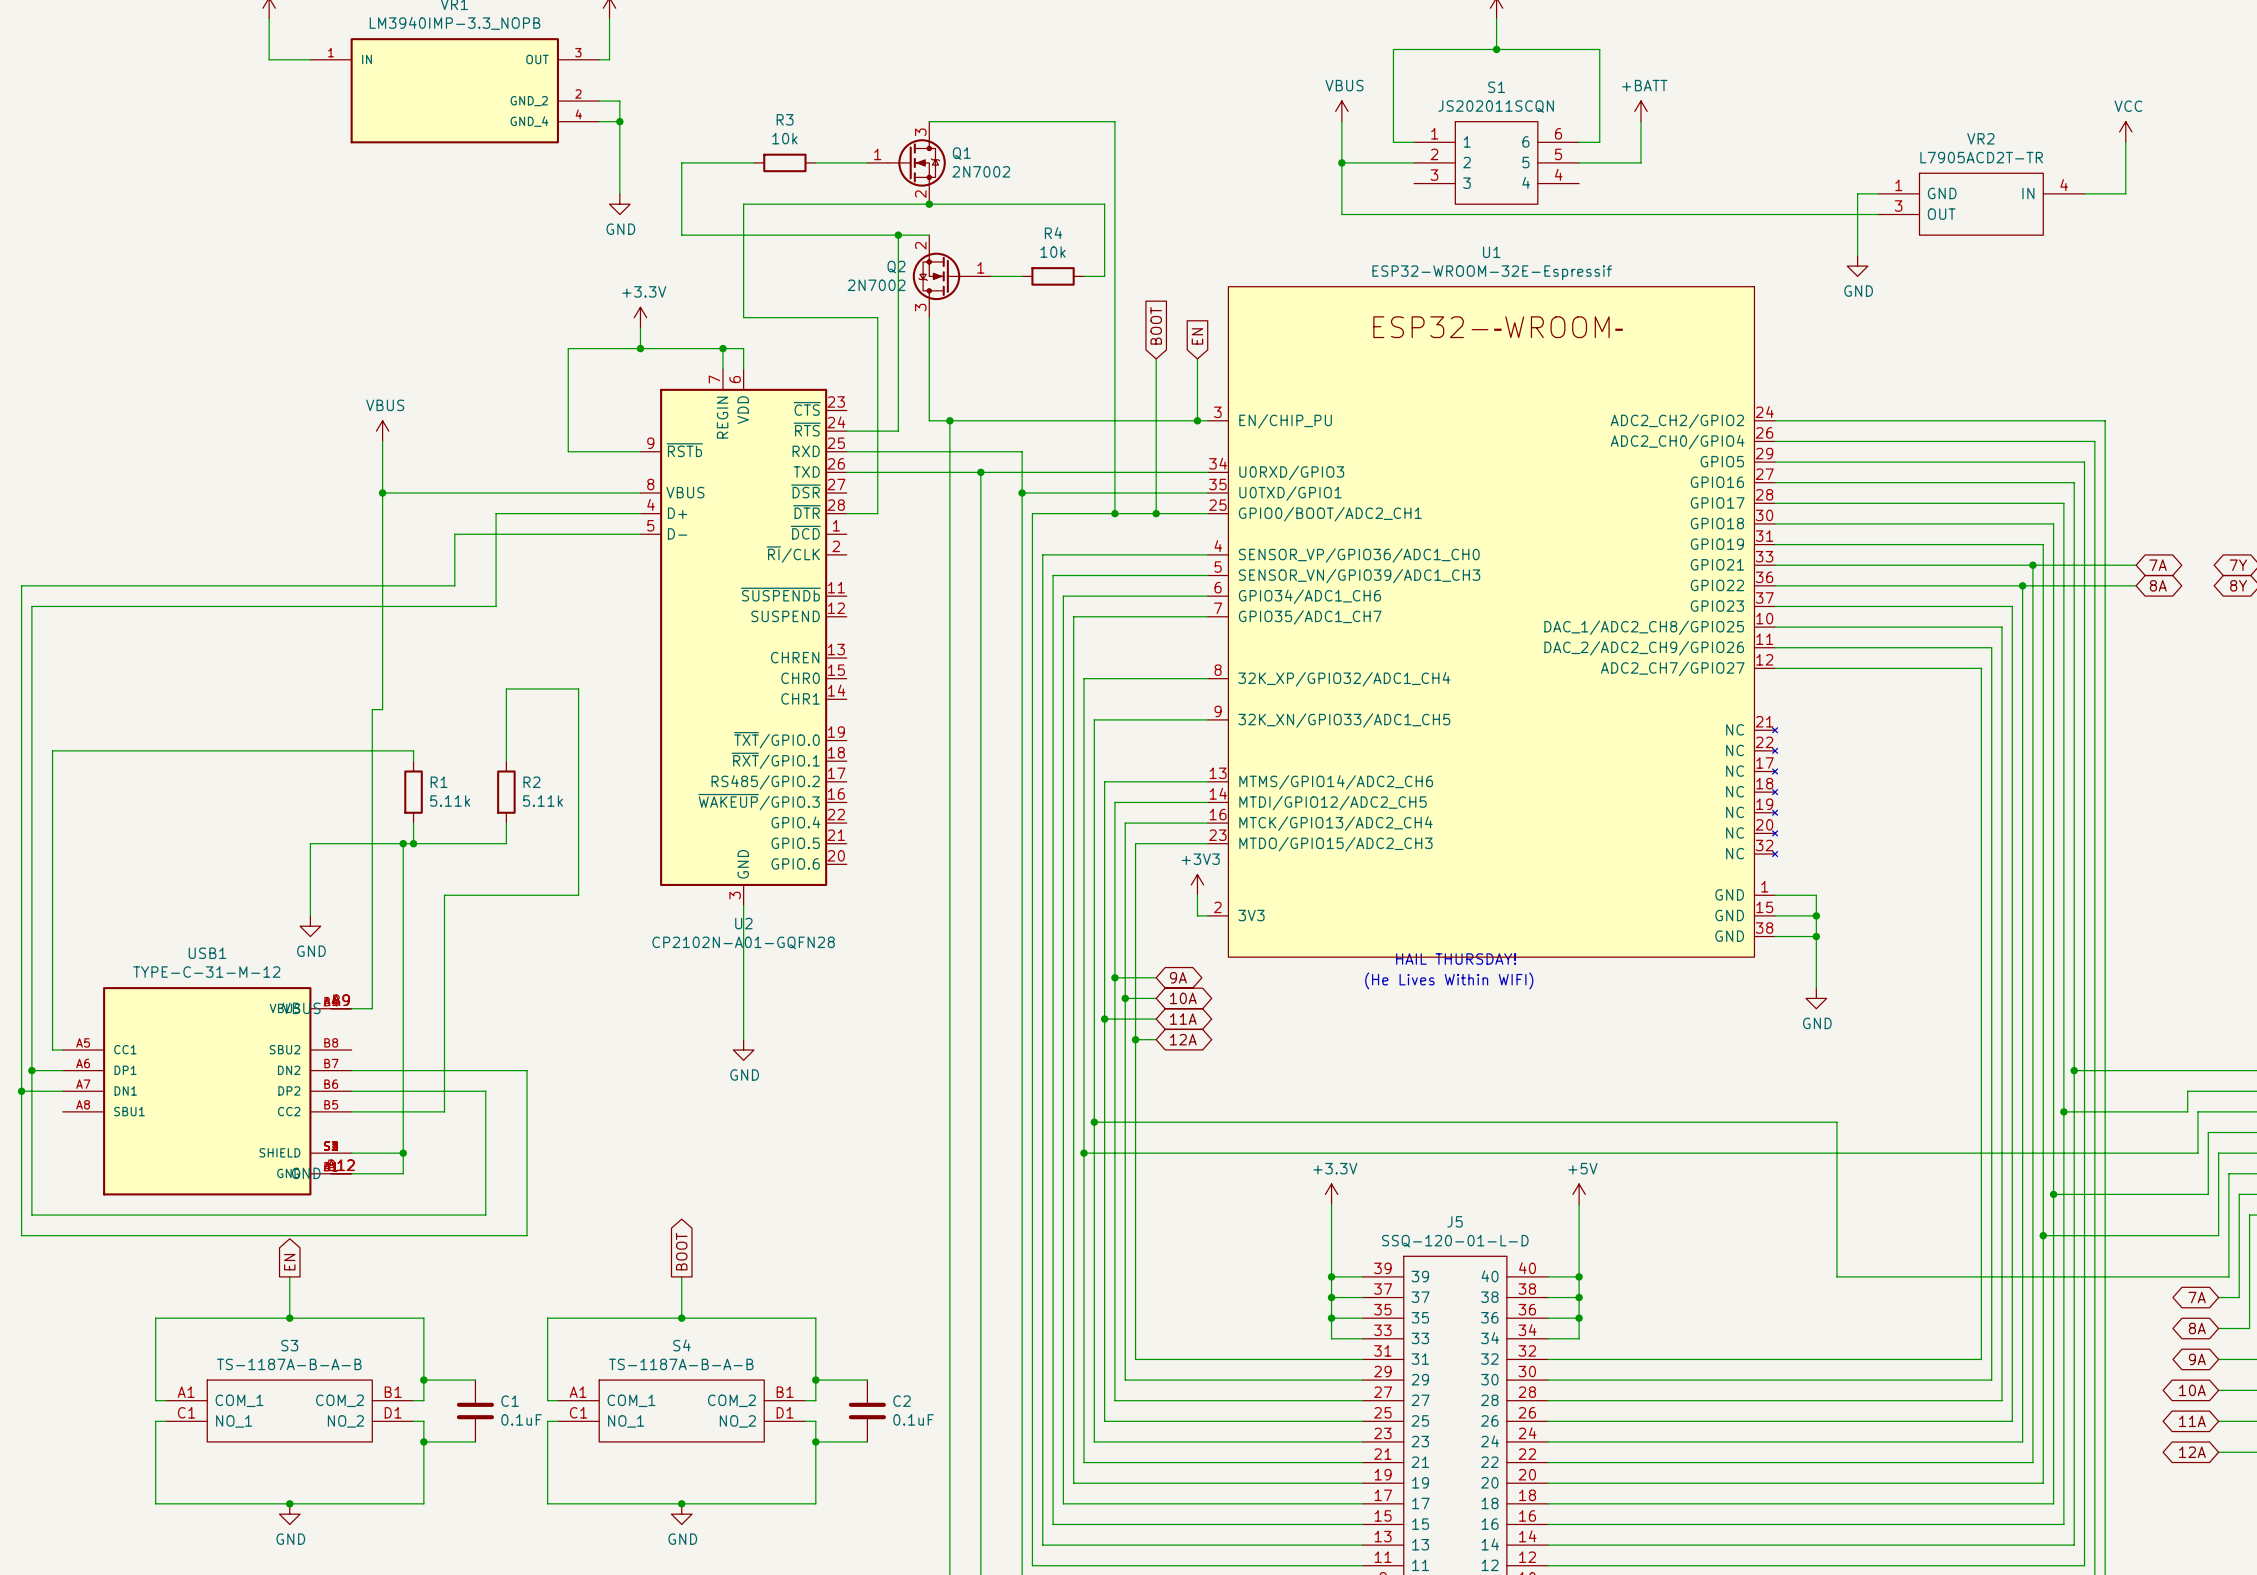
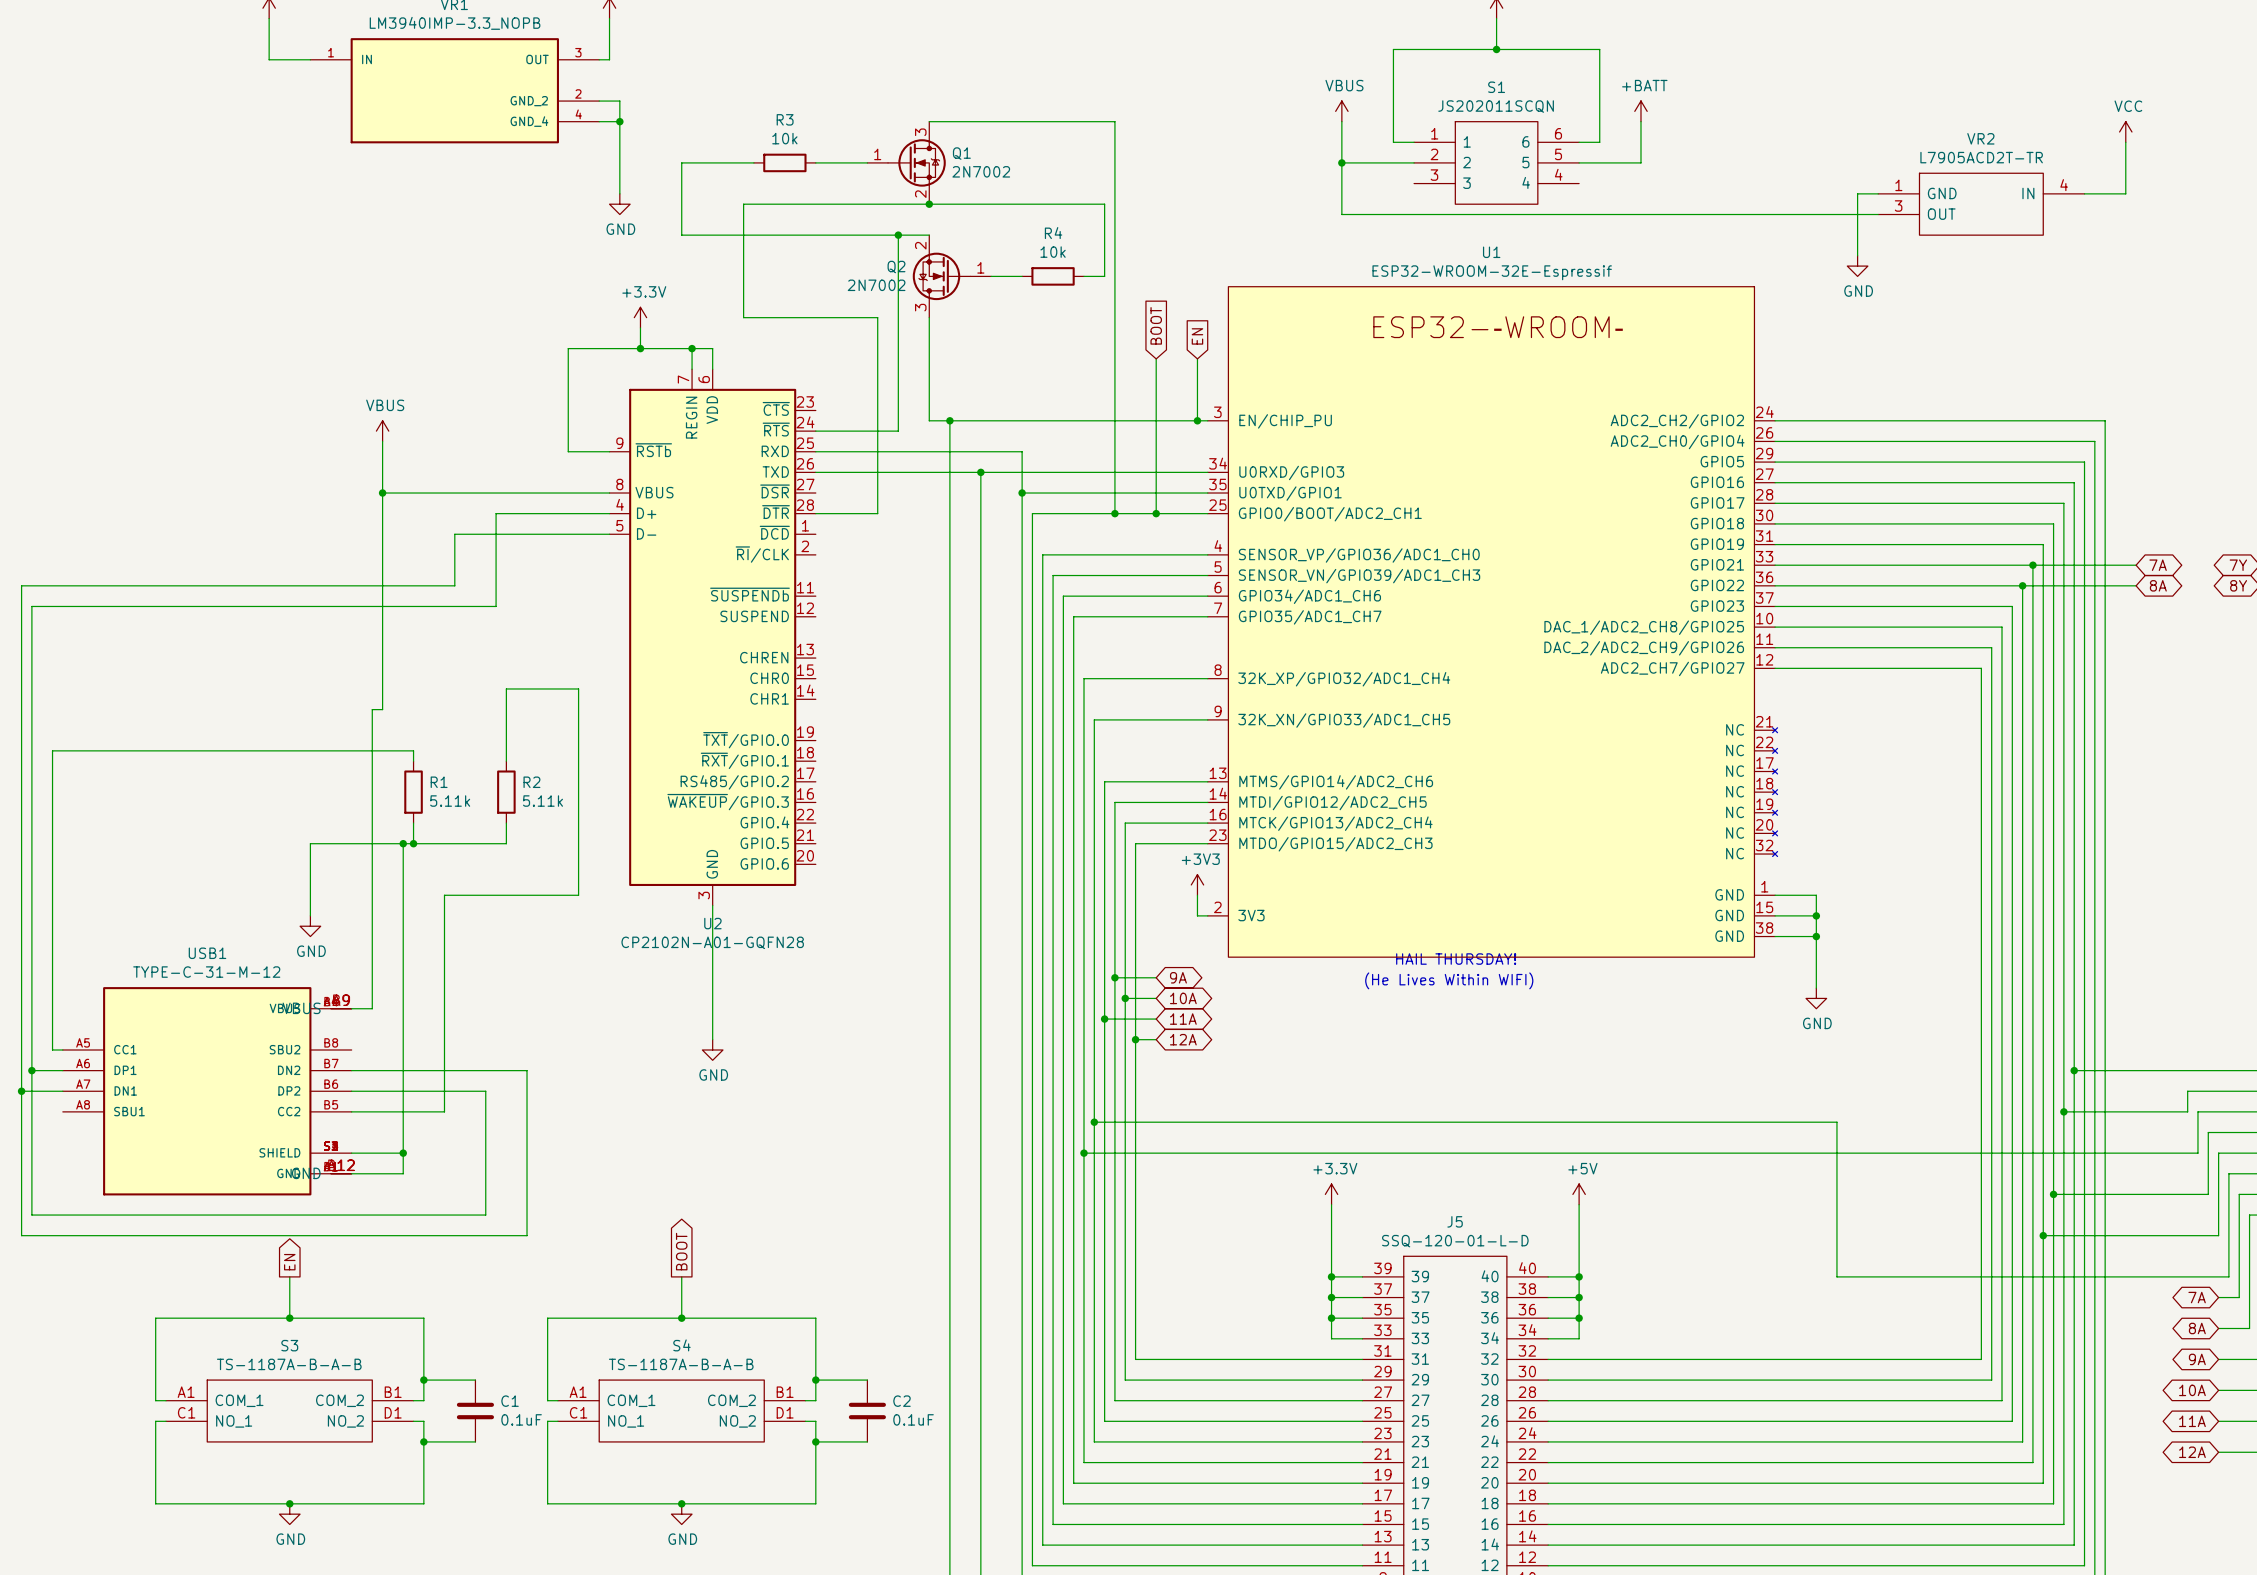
wire: (712, 348) (743, 348) (743, 369) -> (712, 348) (712, 369)
wire: (722, 348) (722, 369) -> (692, 348) (692, 369)
junction position: (722, 348) -> (692, 348)
U2 position: (743, 637) -> (712, 637)
wire: (743, 905) (743, 1039) -> (712, 905) (712, 1039)
power symbol position: GND (743, 1049) -> GND (712, 1049)

